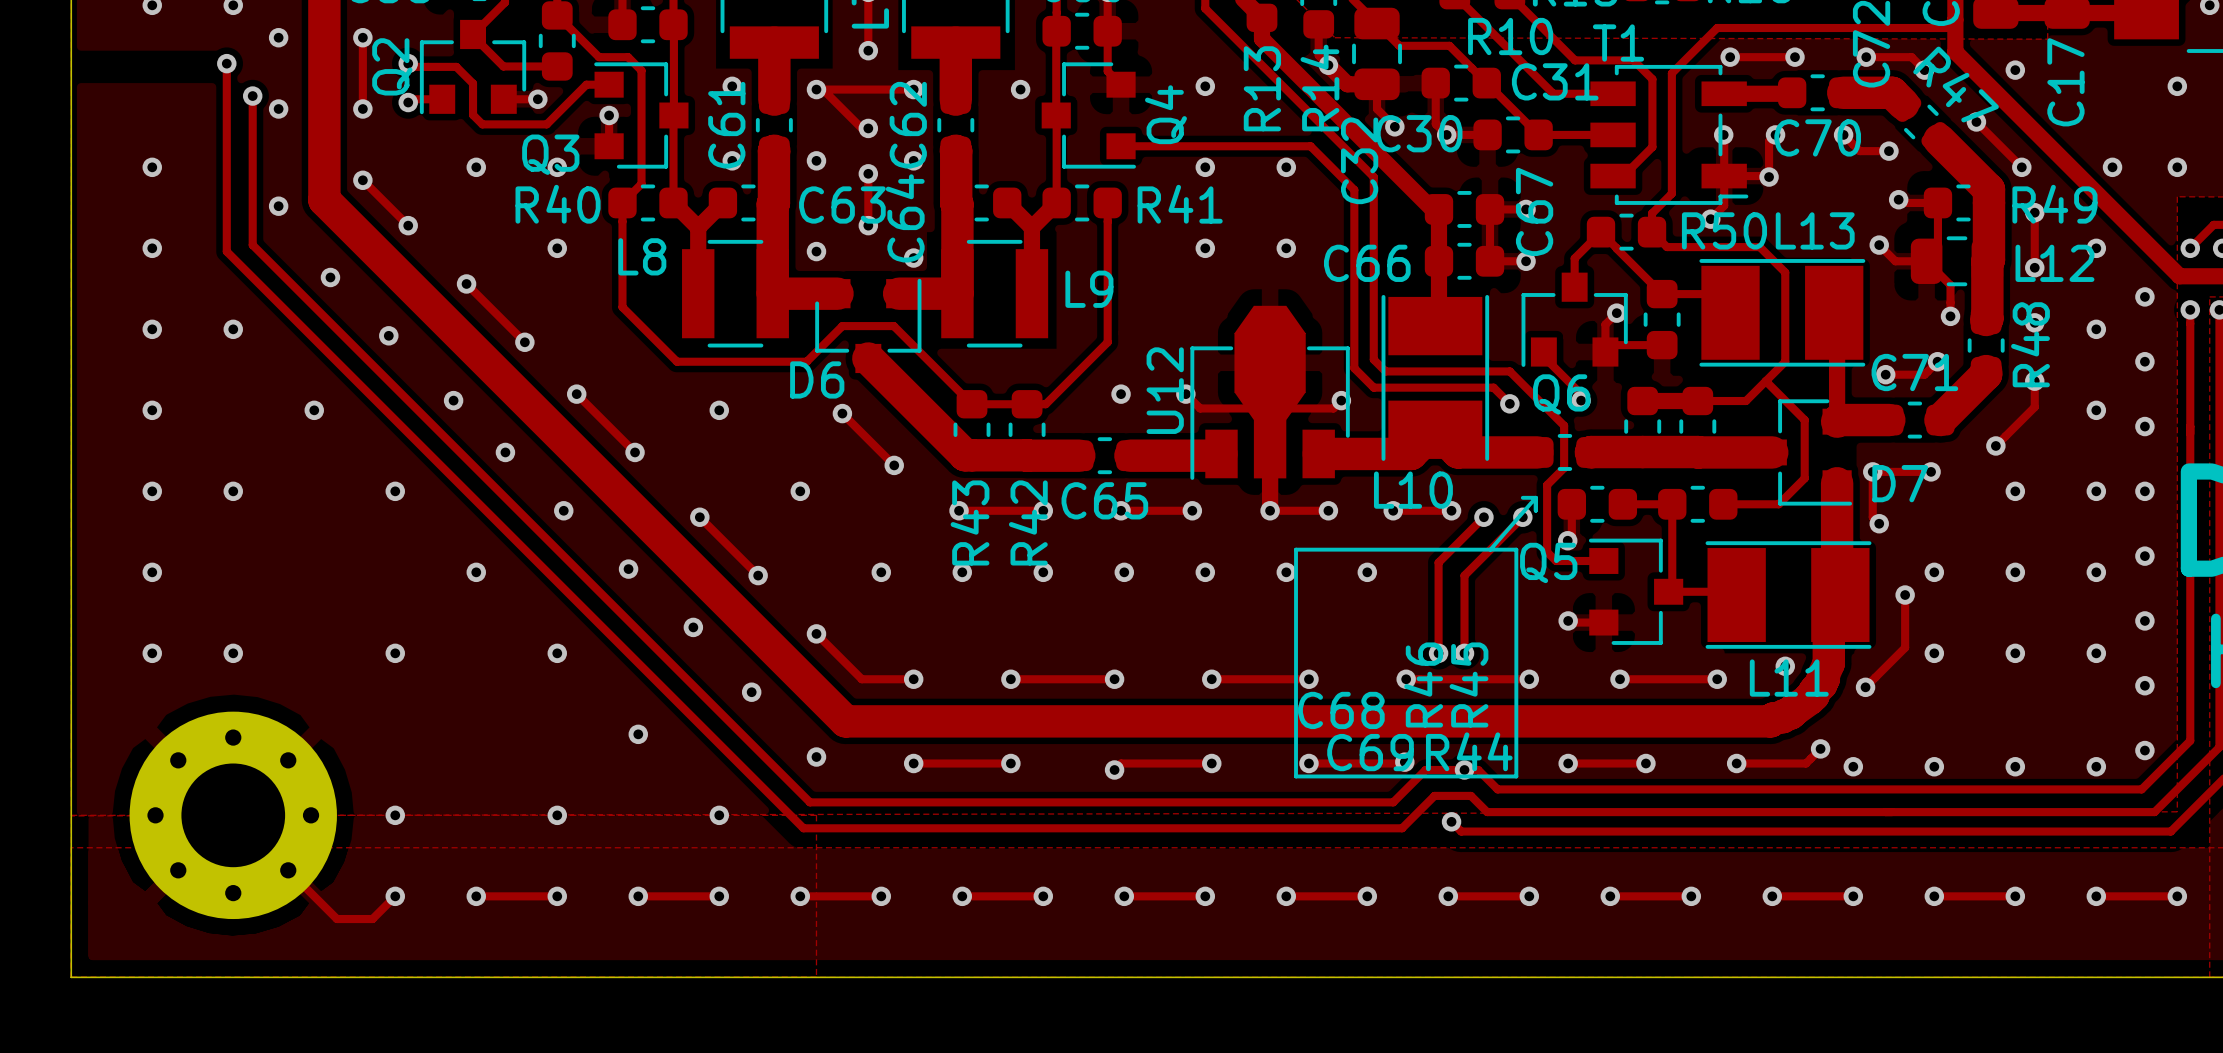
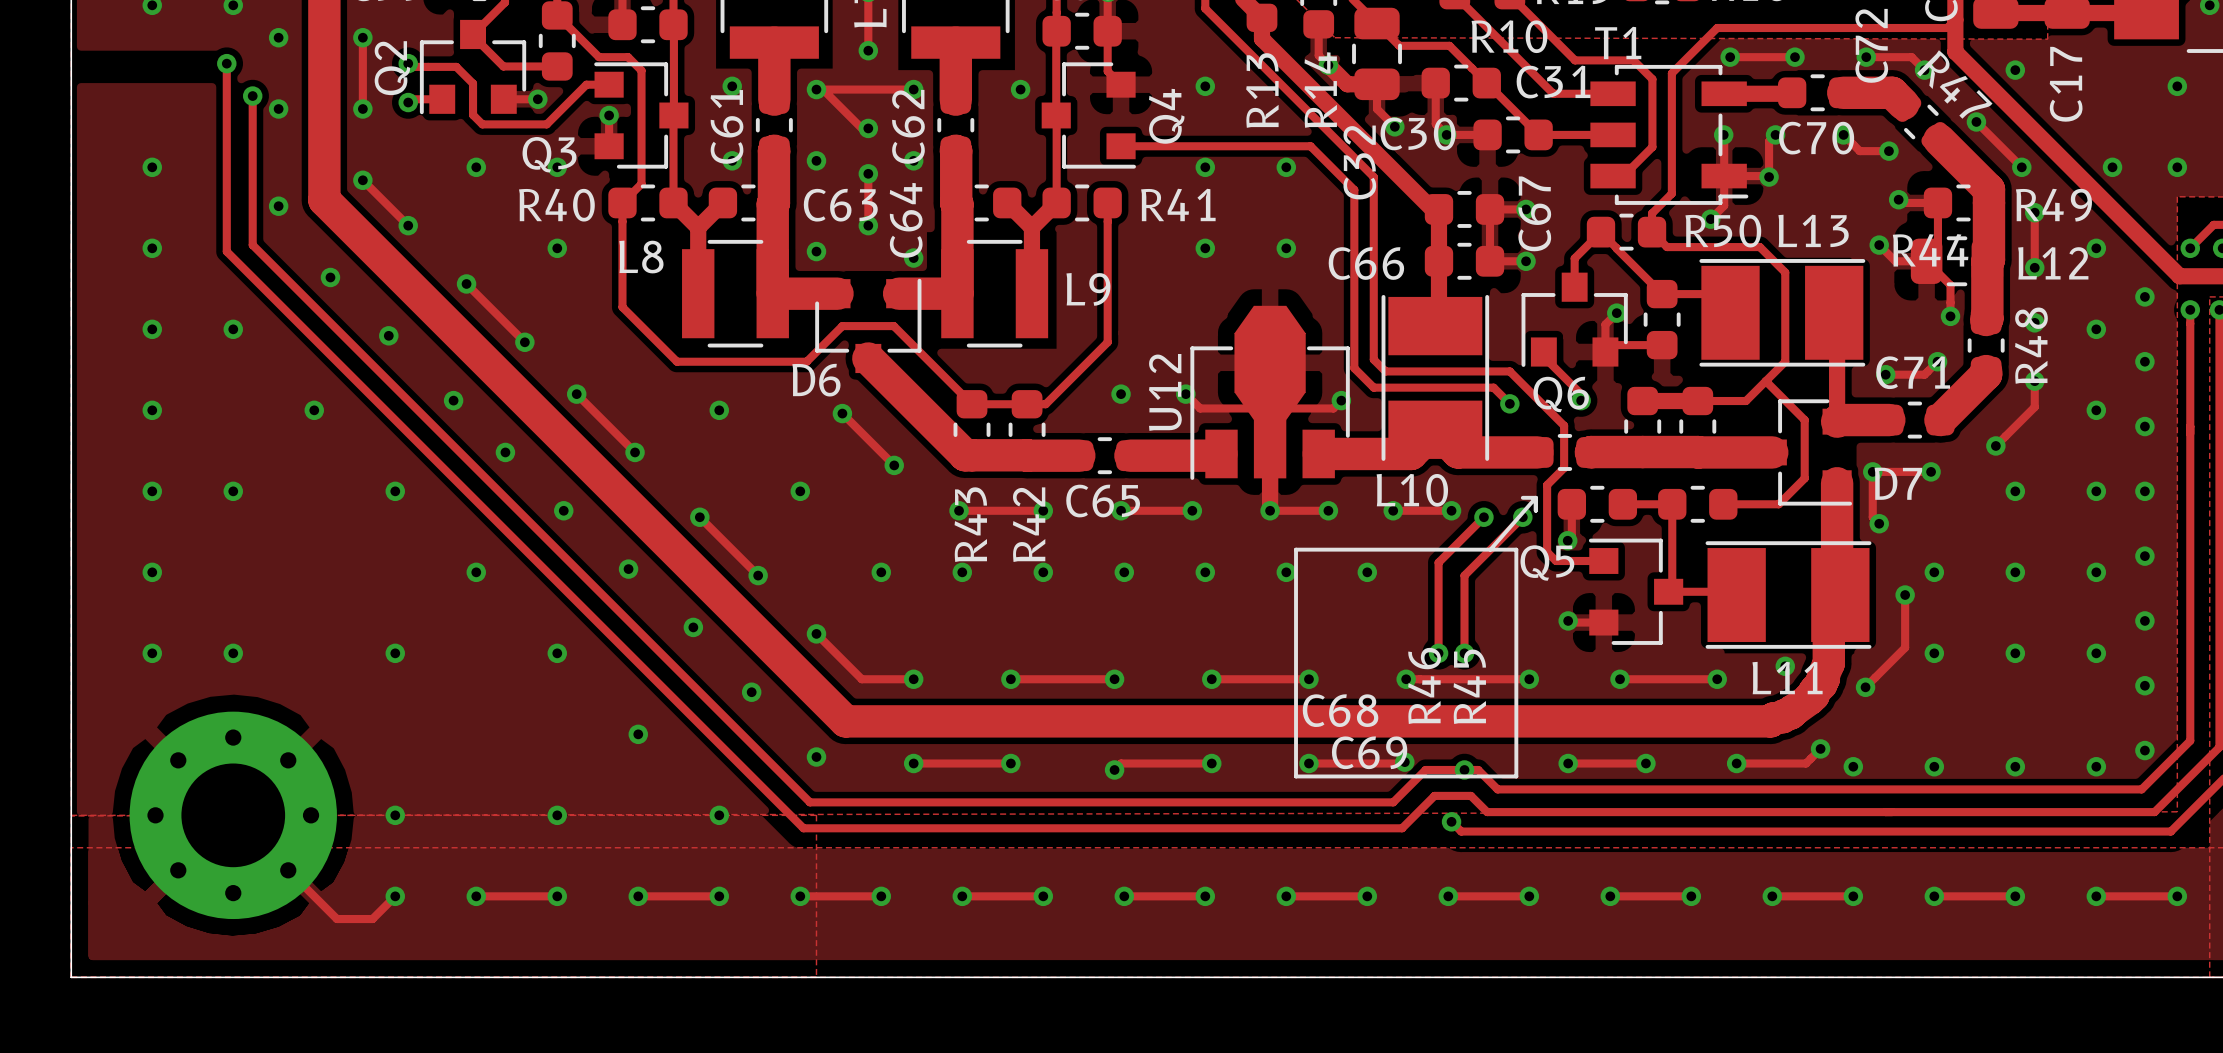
R44 name position: R44 (1469, 751) -> R44 (1930, 250)

